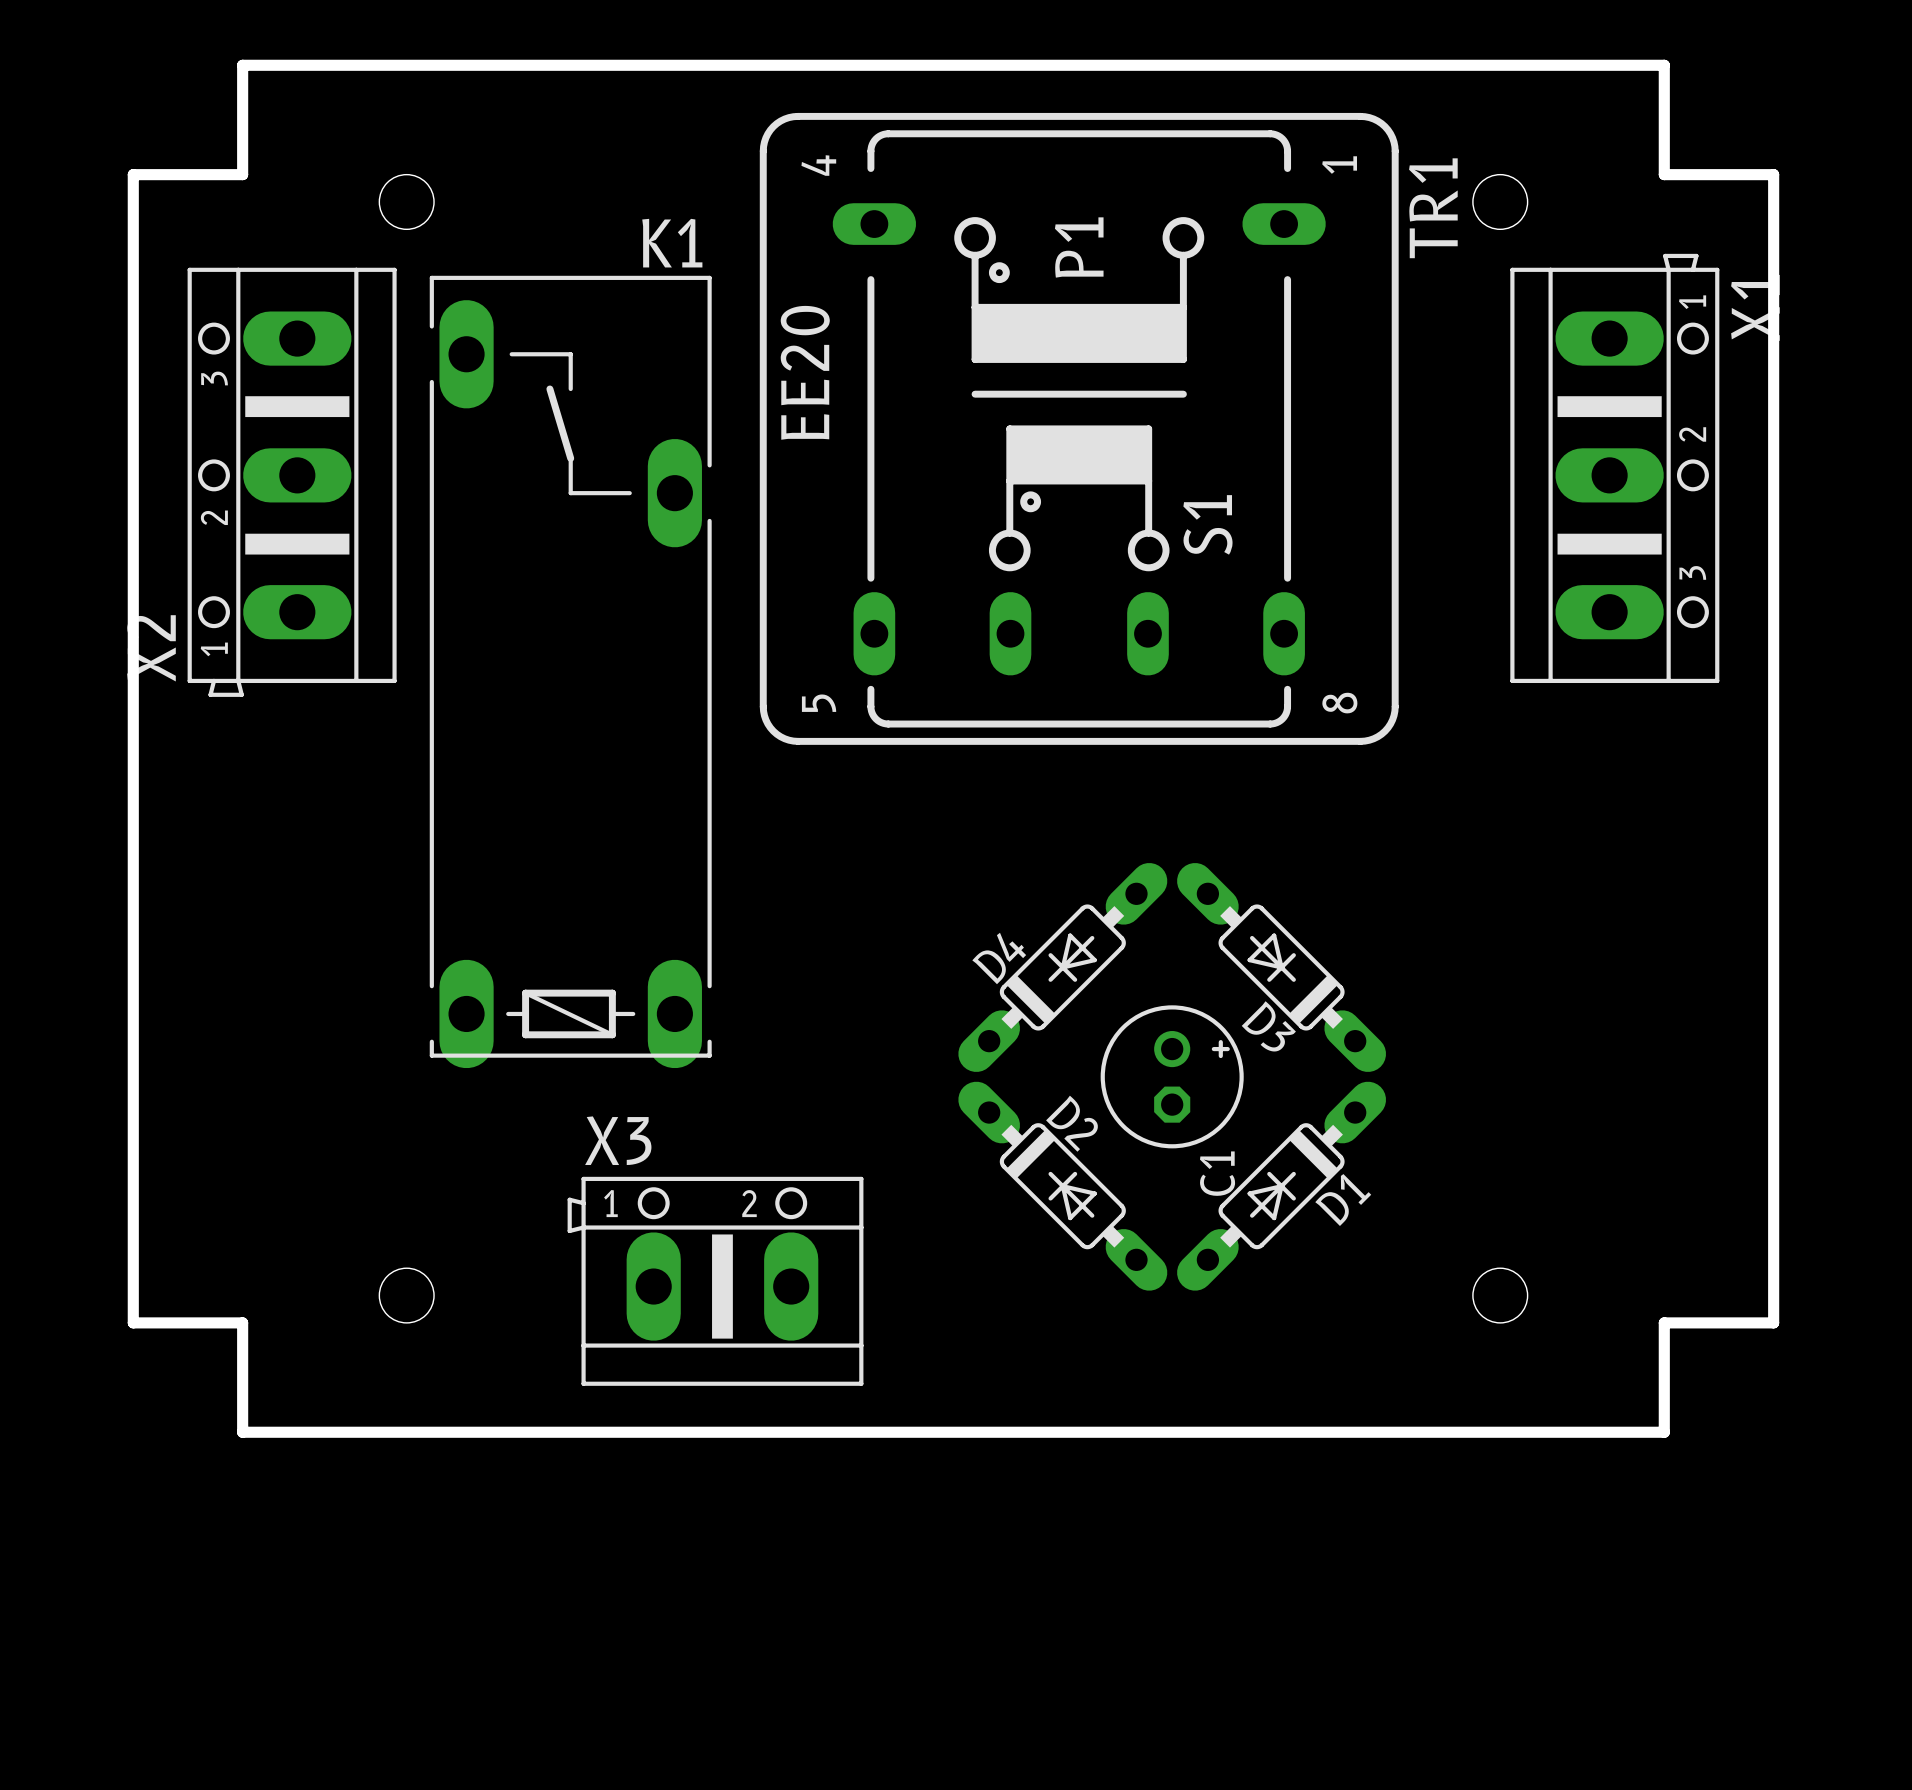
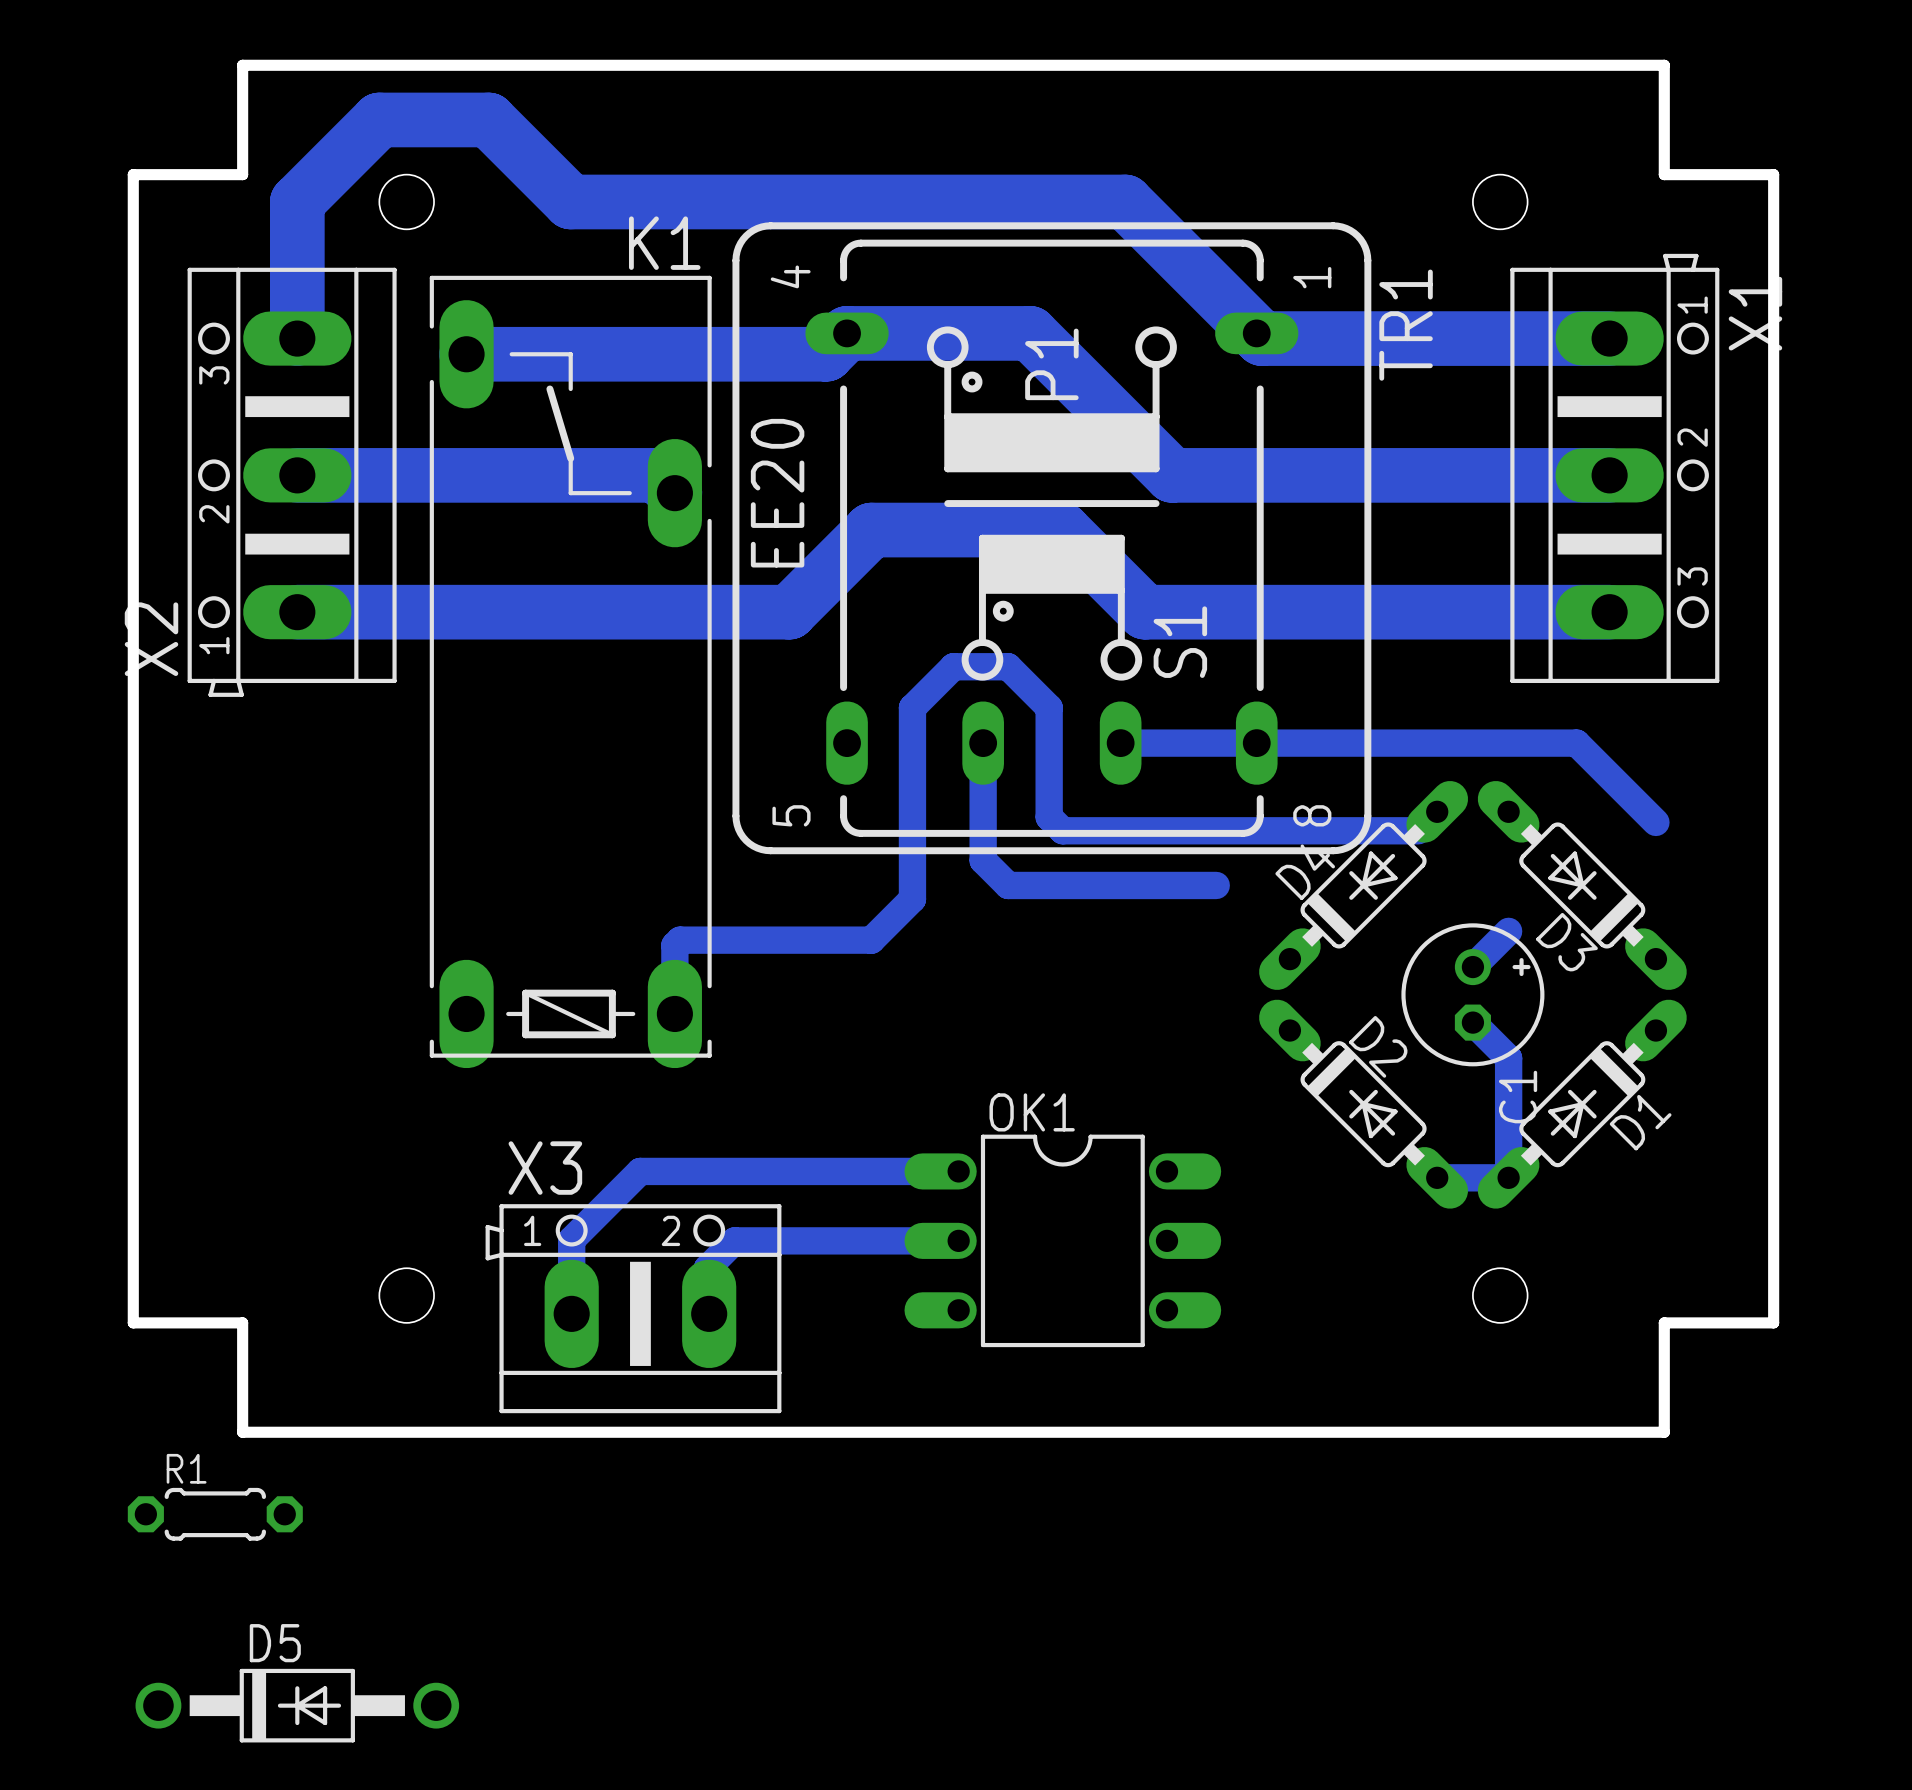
bottom track: none -> (297, 338) (297, 201) (379, 119) (488, 119) (570, 201) (1125, 201) (1261, 338) (1609, 338)
bottom track: none -> (466, 354) (826, 354) (847, 333) (1030, 333) (1172, 475) (1609, 475)
TR1 position: (1079, 428) -> (1051, 538)
bottom track: none -> (297, 475) (657, 475) (674, 493)
bottom track: none -> (297, 612) (789, 612) (871, 530) (1062, 530) (1144, 612) (1609, 612)
bottom track: none -> (983, 743) (983, 860) (1008, 885) (1216, 885)
bottom track: none -> (1120, 743) (1576, 743) (1655, 822)
bottom track: none -> (1418, 830) (1062, 830) (1049, 817) (1049, 707) (1008, 666) (953, 666) (912, 707) (912, 899) (871, 940) (680, 940) (674, 945) (674, 1013)
bottom track: none -> (1508, 931) (1472, 967)
D4 position: (1062, 967) -> (1363, 885)
D3 position: (1281, 967) -> (1582, 885)
bottom track: none -> (1472, 1022) (1508, 1058) (1508, 1177) (1437, 1177) (1430, 1171)
C1 position: (1172, 1076) -> (1472, 994)
bottom track: none -> (958, 1171) (640, 1171) (571, 1239) (571, 1313)
D2 position: (1062, 1186) -> (1363, 1104)
D1 position: (1281, 1186) -> (1582, 1104)
bottom track: none -> (958, 1240) (734, 1240) (707, 1268) (709, 1269) (709, 1313)
OK1: none -> (1062, 1240)
X3 position: (715, 1281) -> (633, 1308)
R1: none -> (215, 1514)
D5: none -> (297, 1705)

